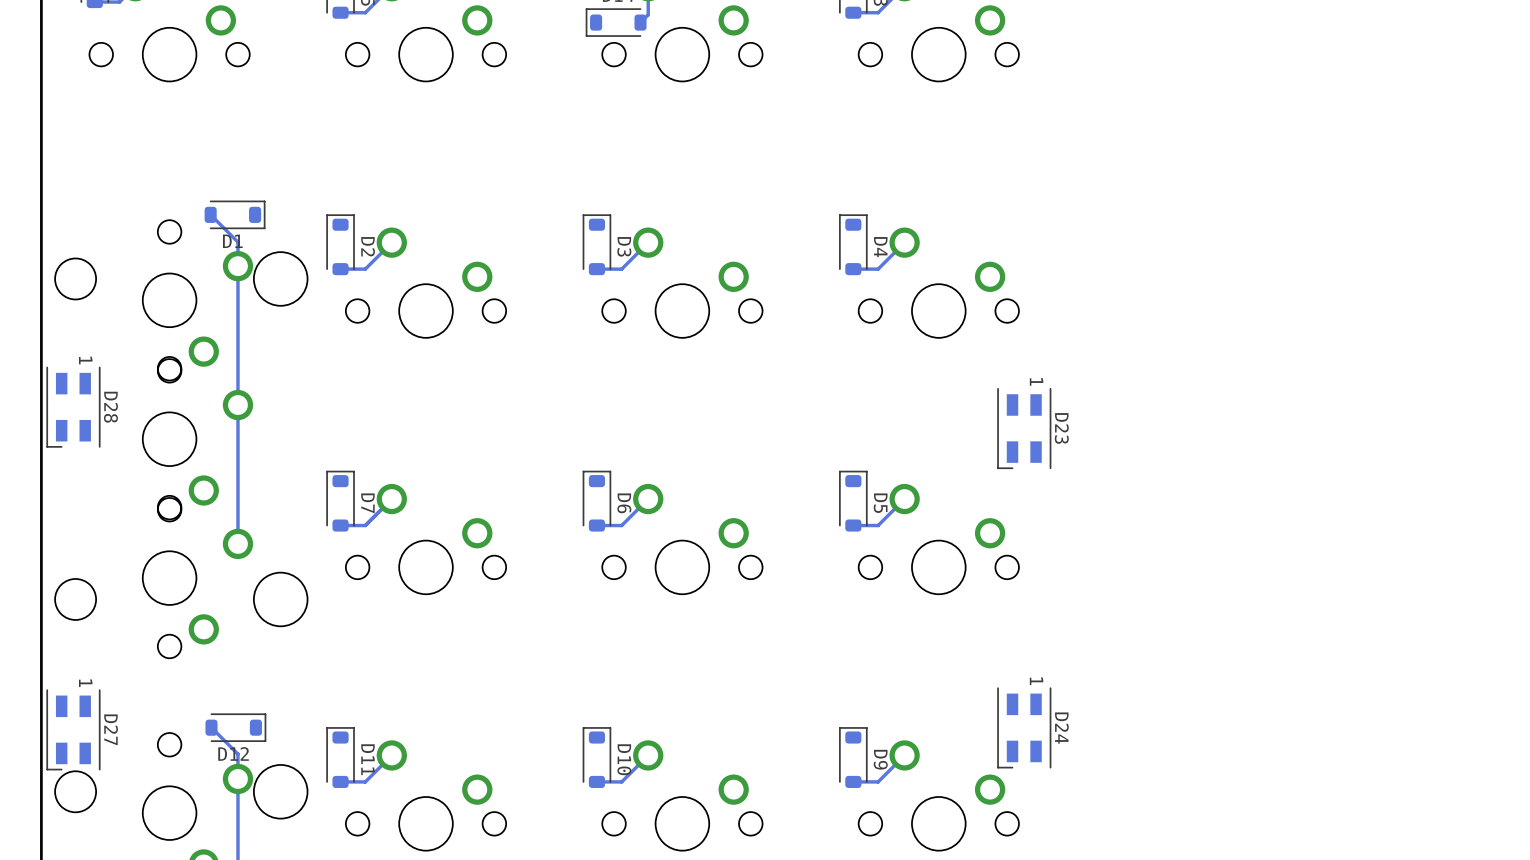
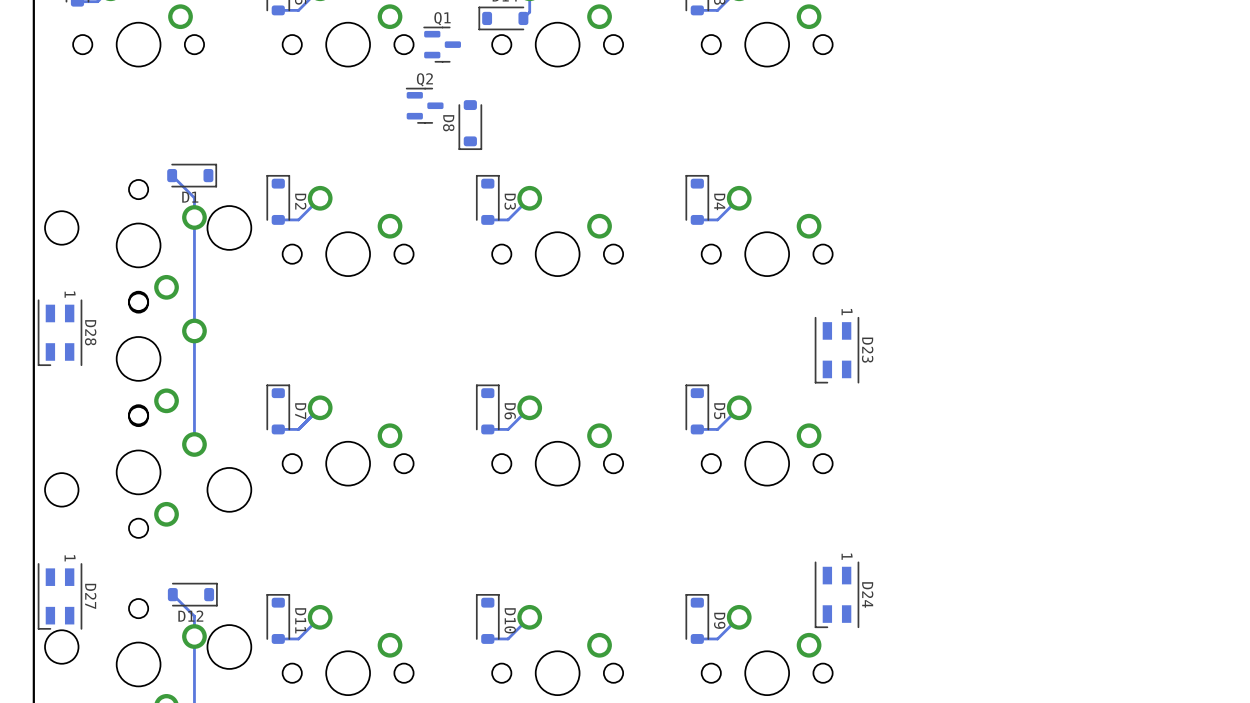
Q1: none -> (442, 44)
Q2: none -> (424, 105)
D8: none -> (470, 124)

